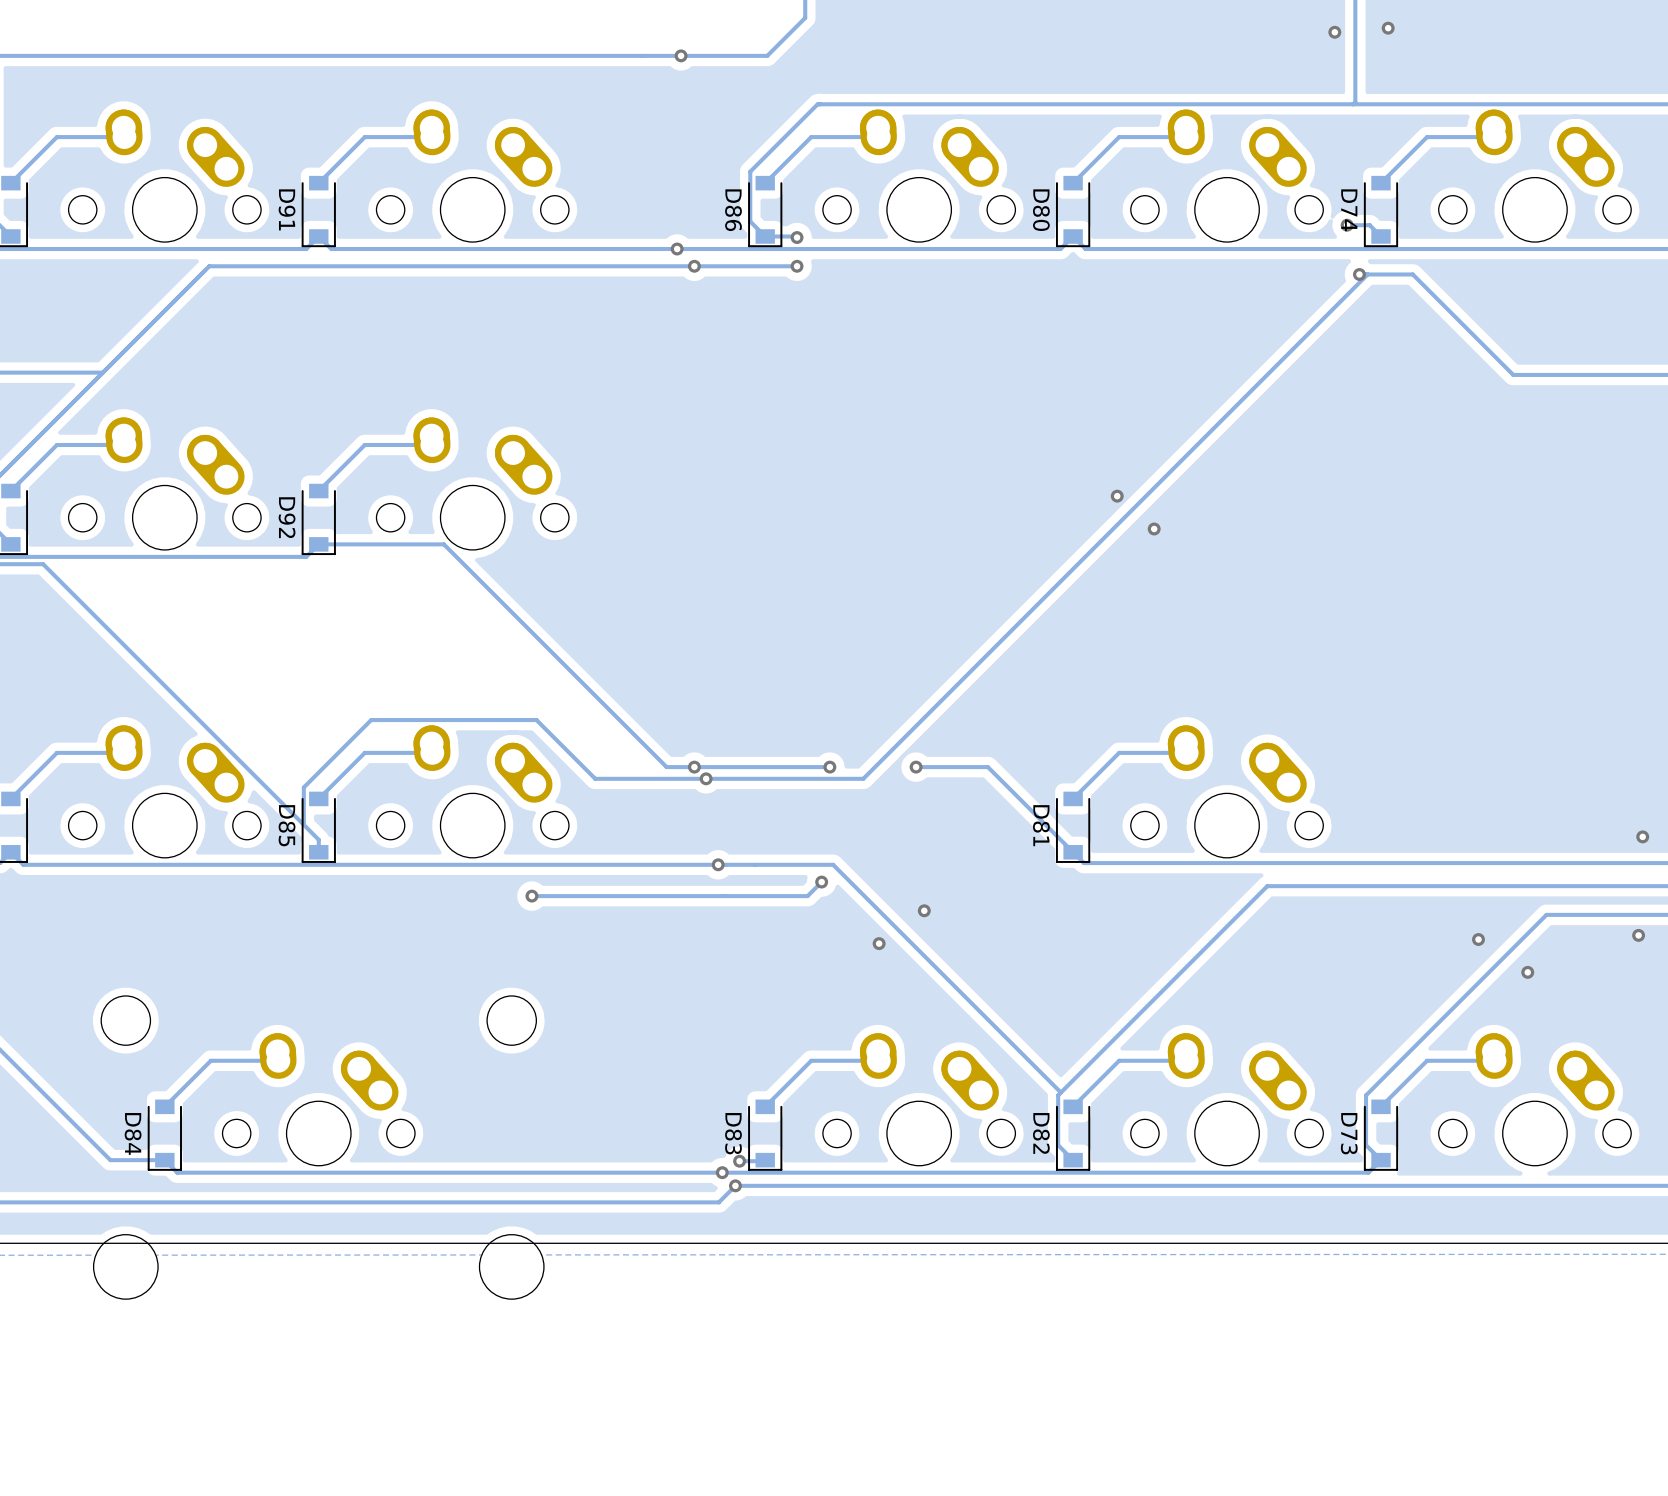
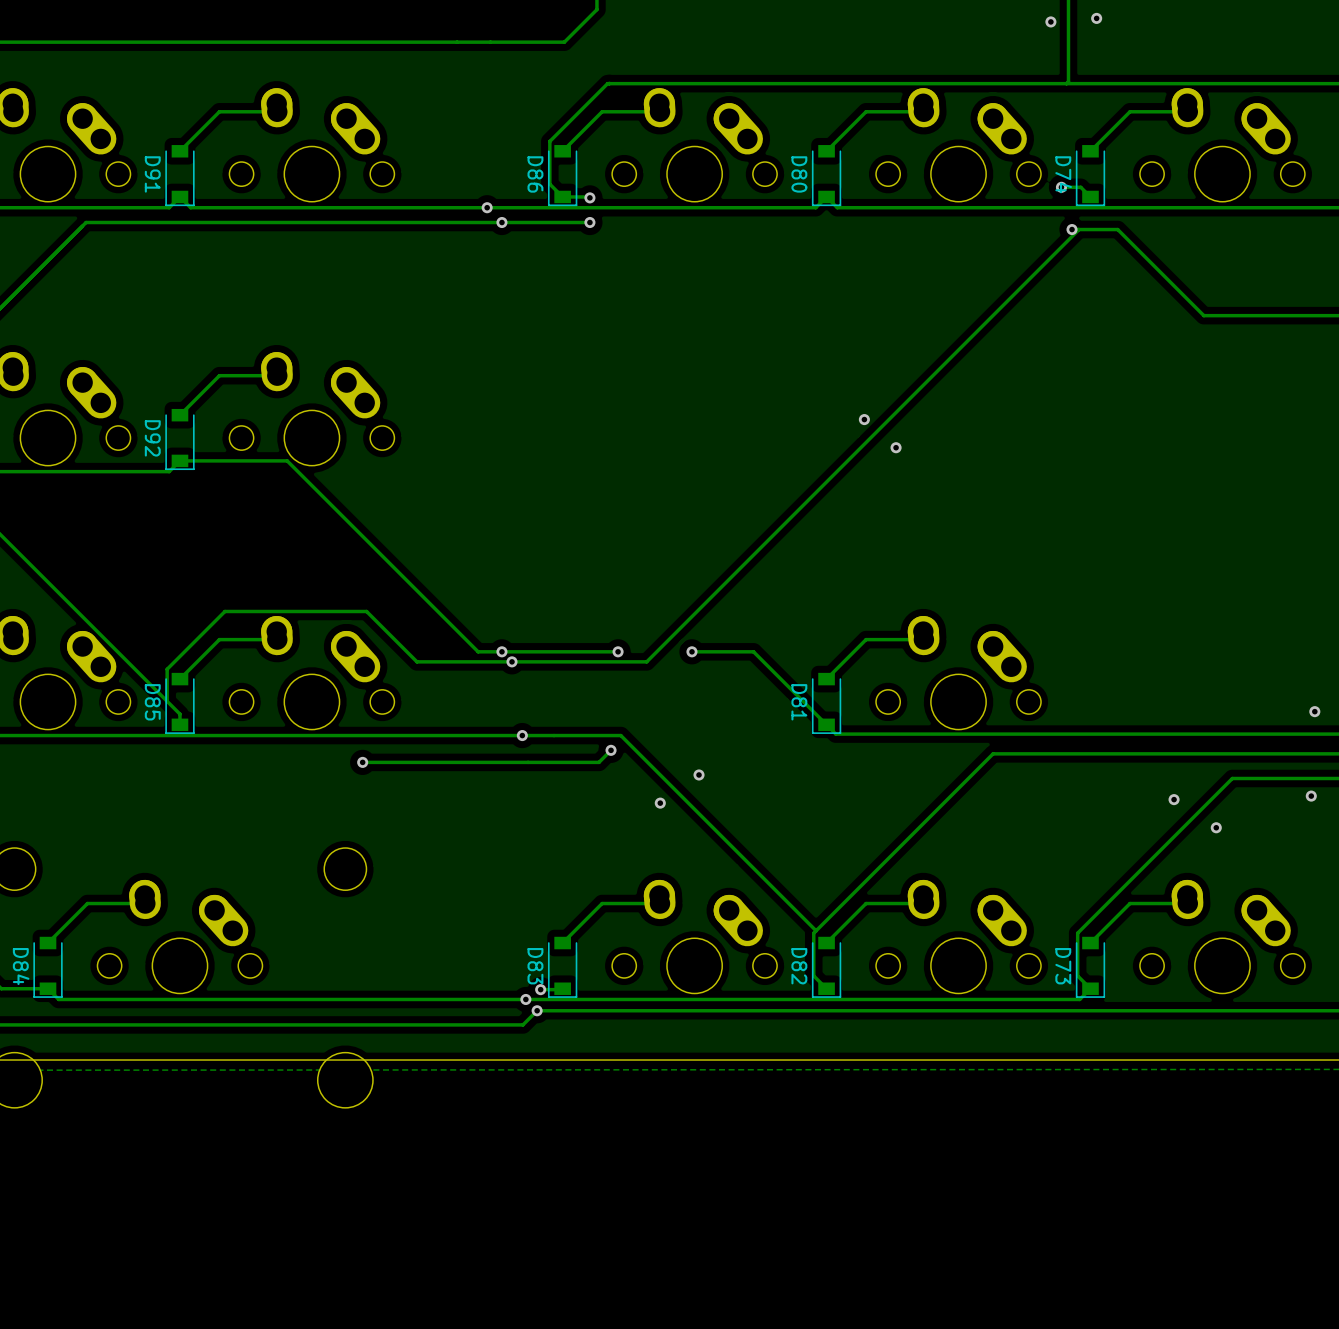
via: (681, 55) -> none

